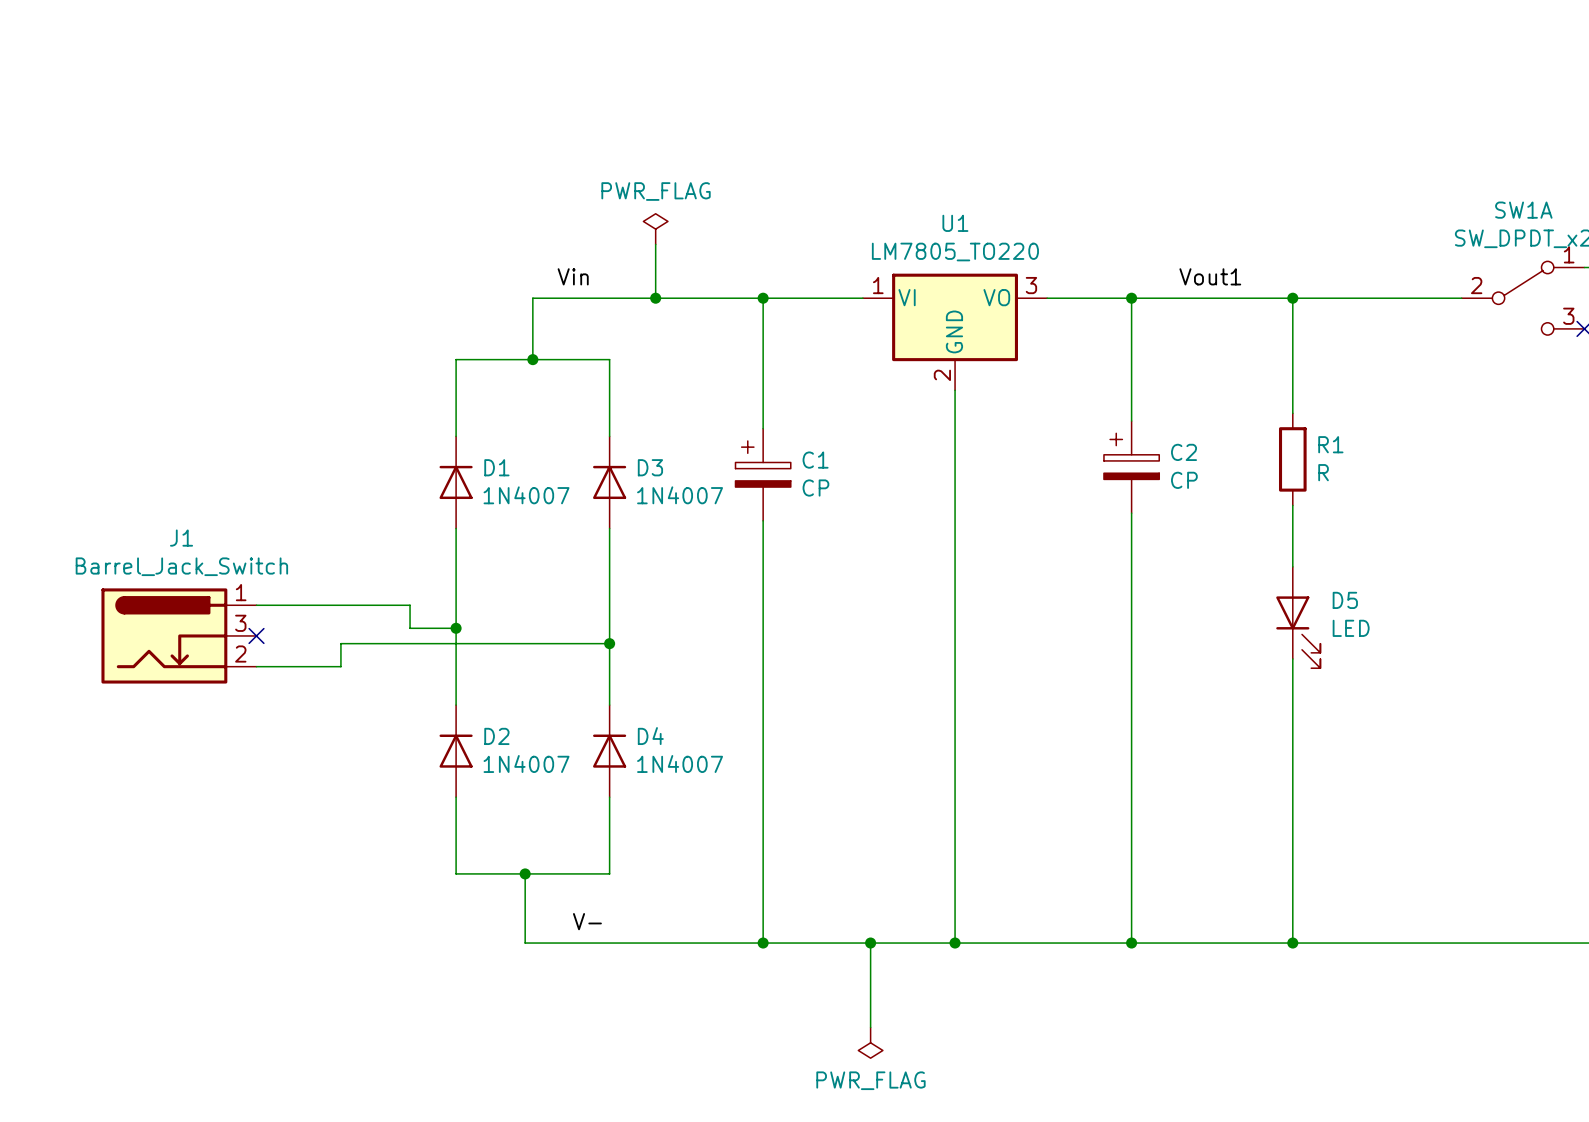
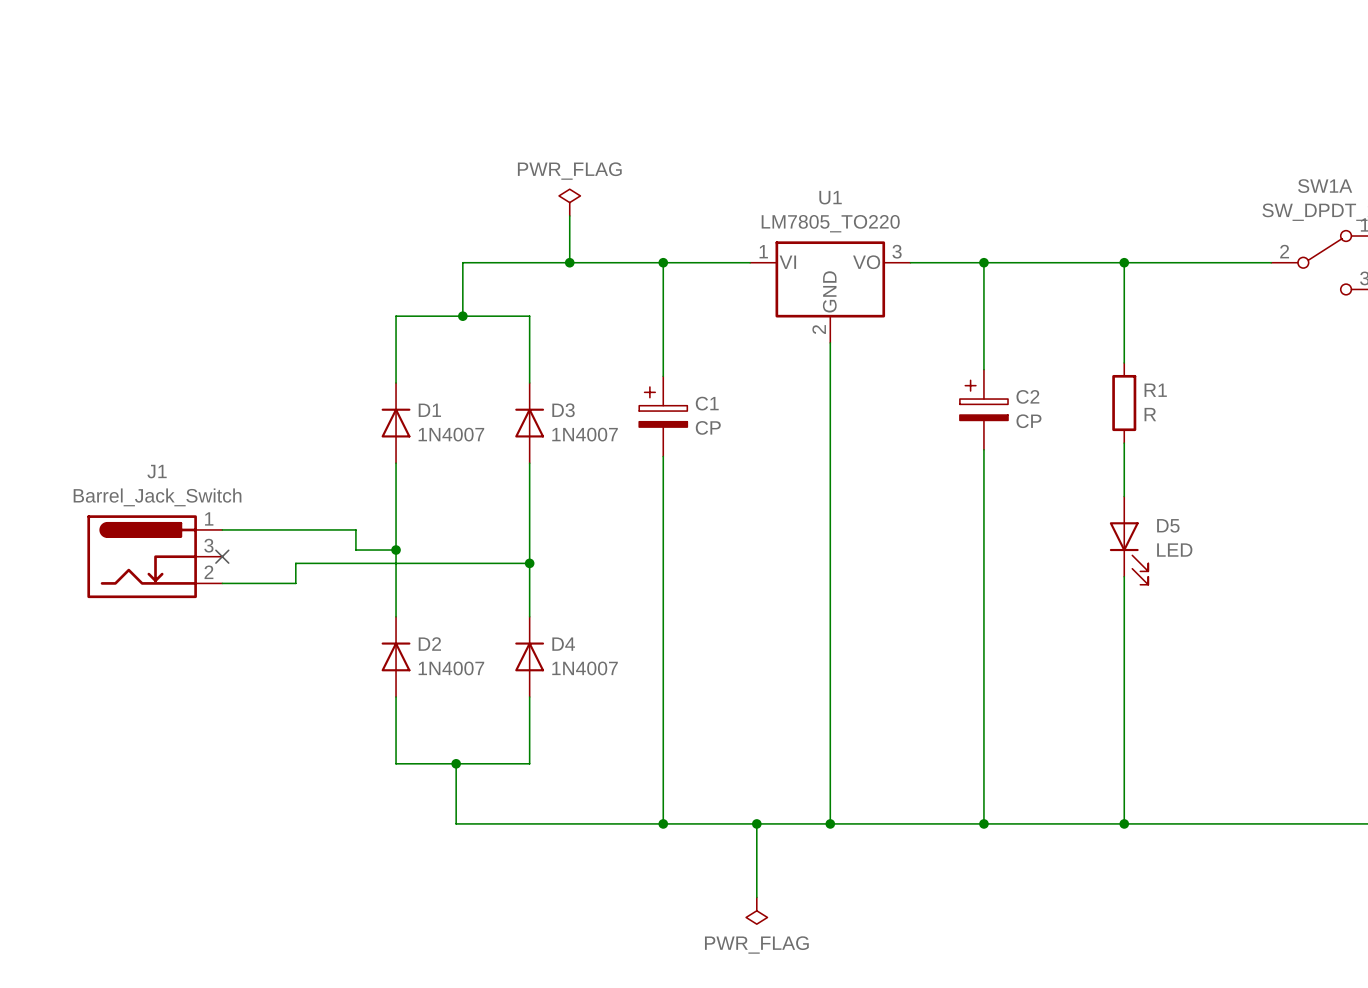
label: Vin (573, 276) -> none
label: Vout1 (1210, 276) -> none
label: V- (587, 921) -> none

